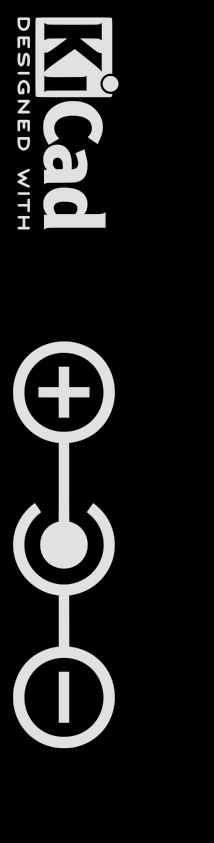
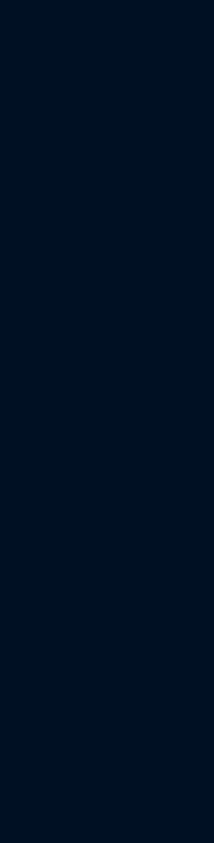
drawing: [17, 17, 119, 230] -> none
drawing: [13, 341, 115, 749] -> none

